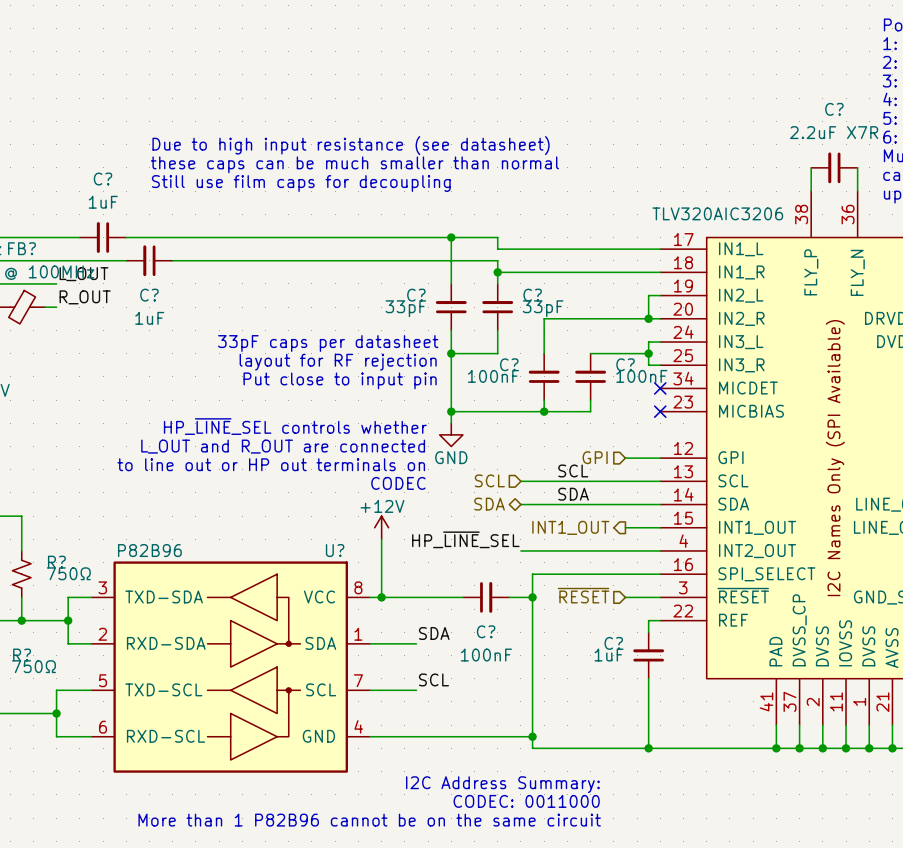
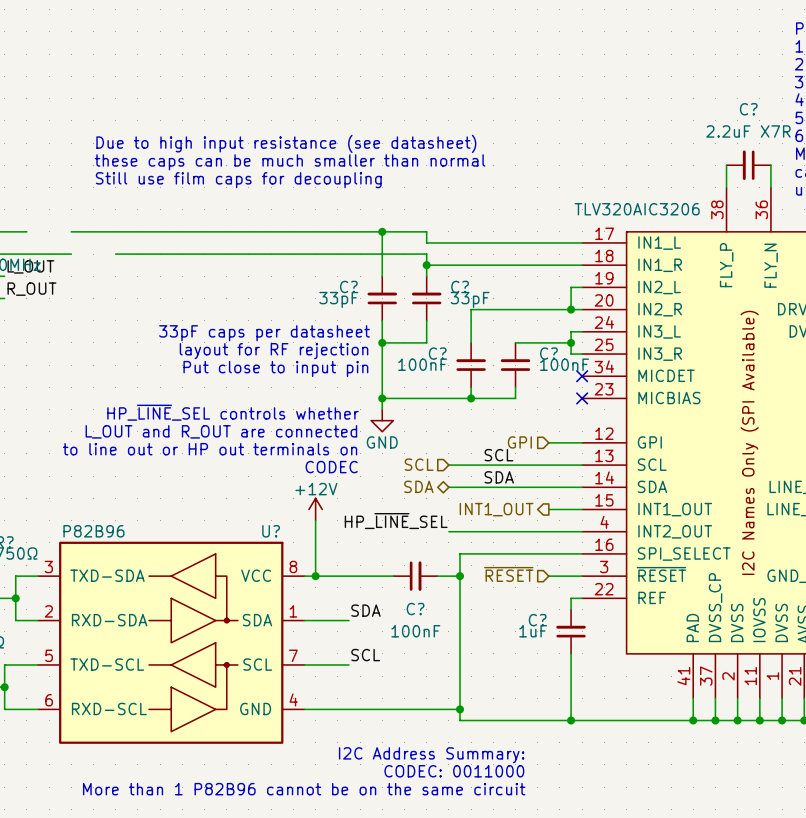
C?: 1uF (103, 237) -> none
C?: 1uF (149, 260) -> none

